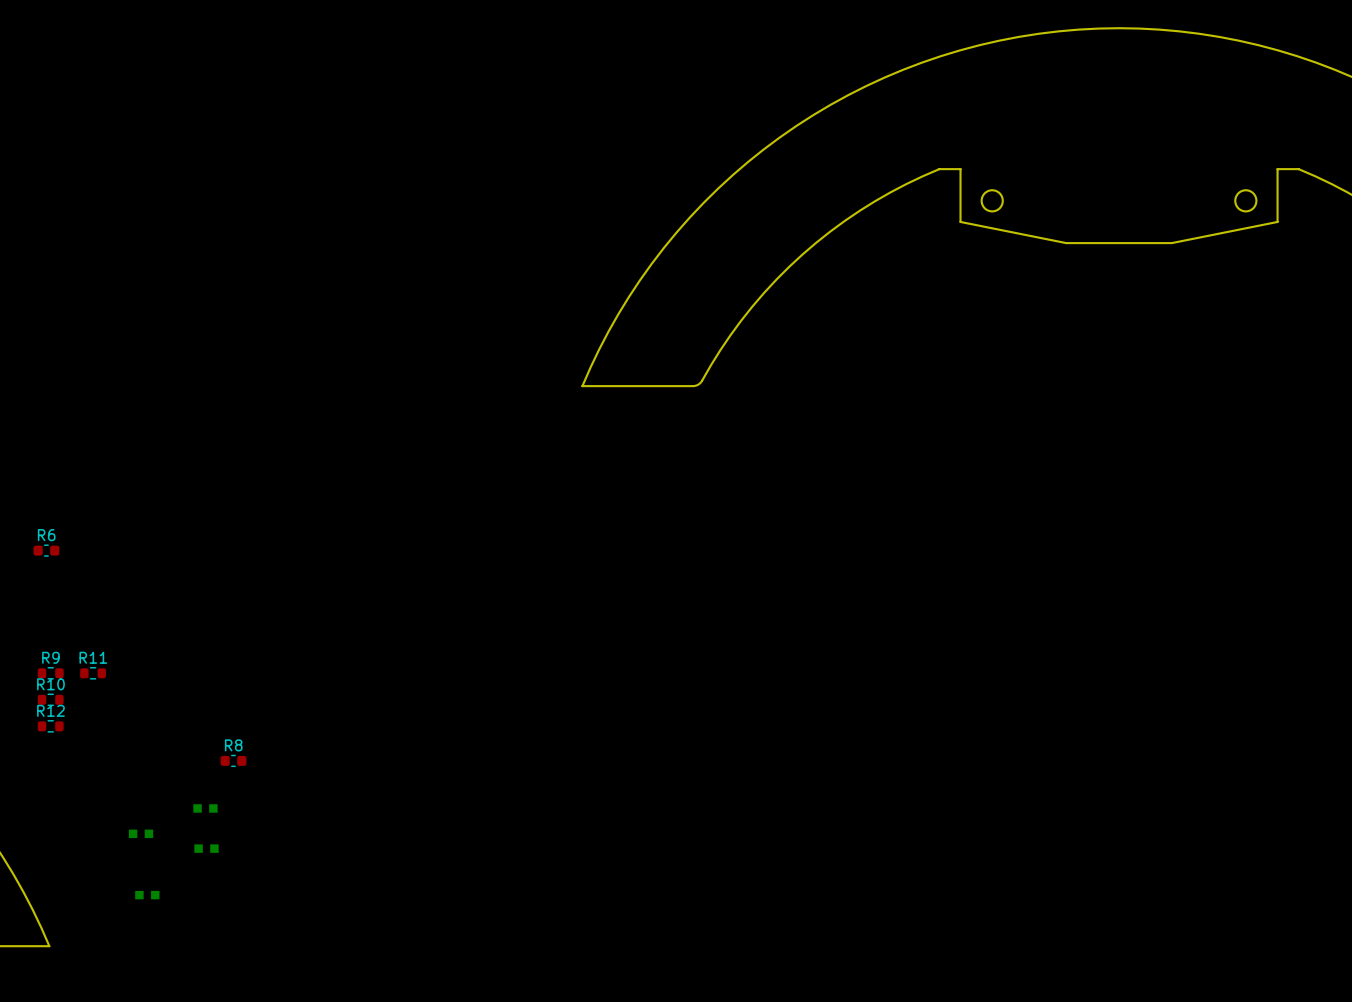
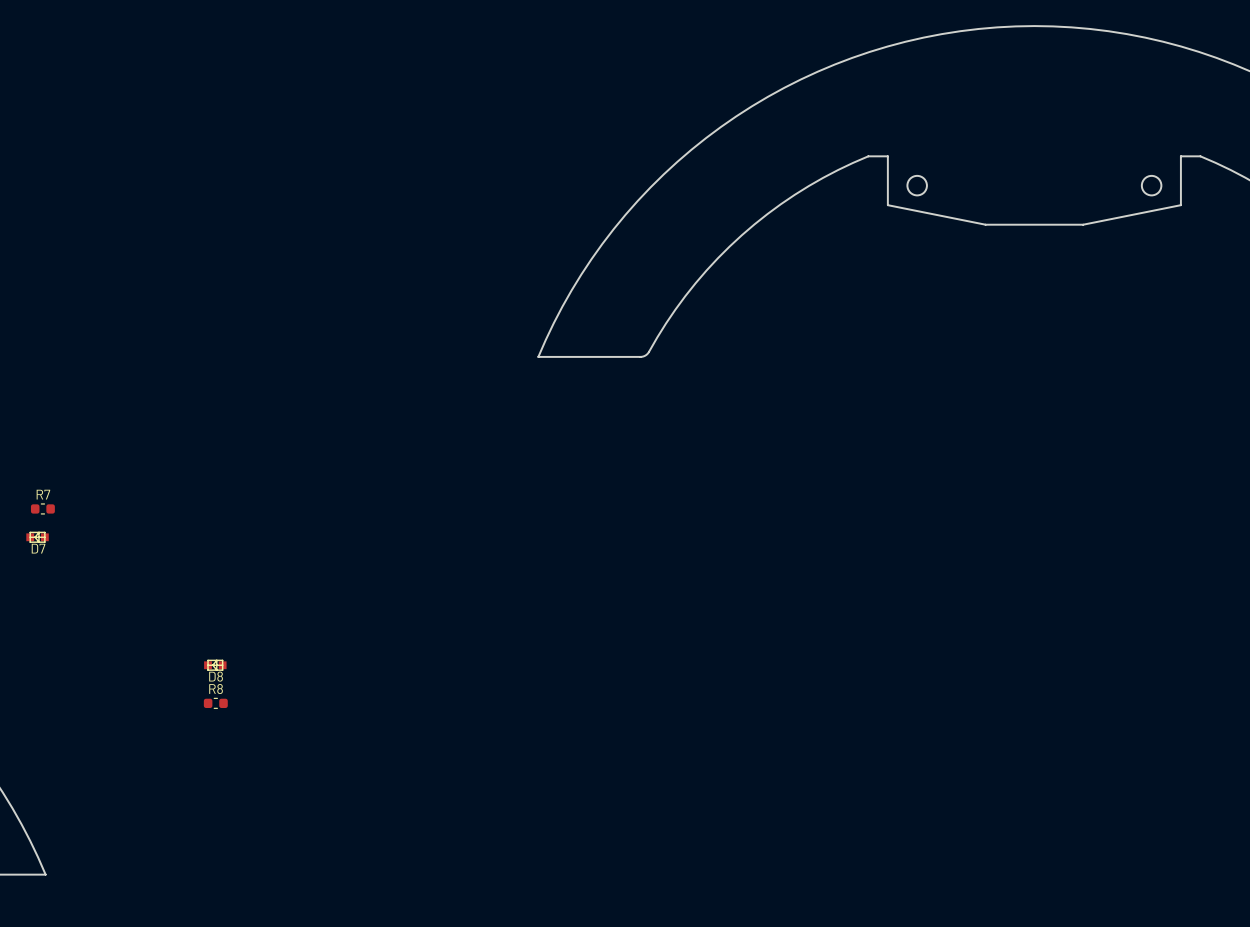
R6 name: R6 (46, 535) -> R7 (43, 494)
D7: none -> (37, 537)
R9: (50, 673) -> none
R11: (93, 673) -> none
R10: (50, 699) -> none
D8: none -> (215, 665)
R12: (50, 726) -> none
part: (205, 808) -> none
part: (141, 833) -> none
part: (206, 848) -> none
part: (147, 895) -> none

